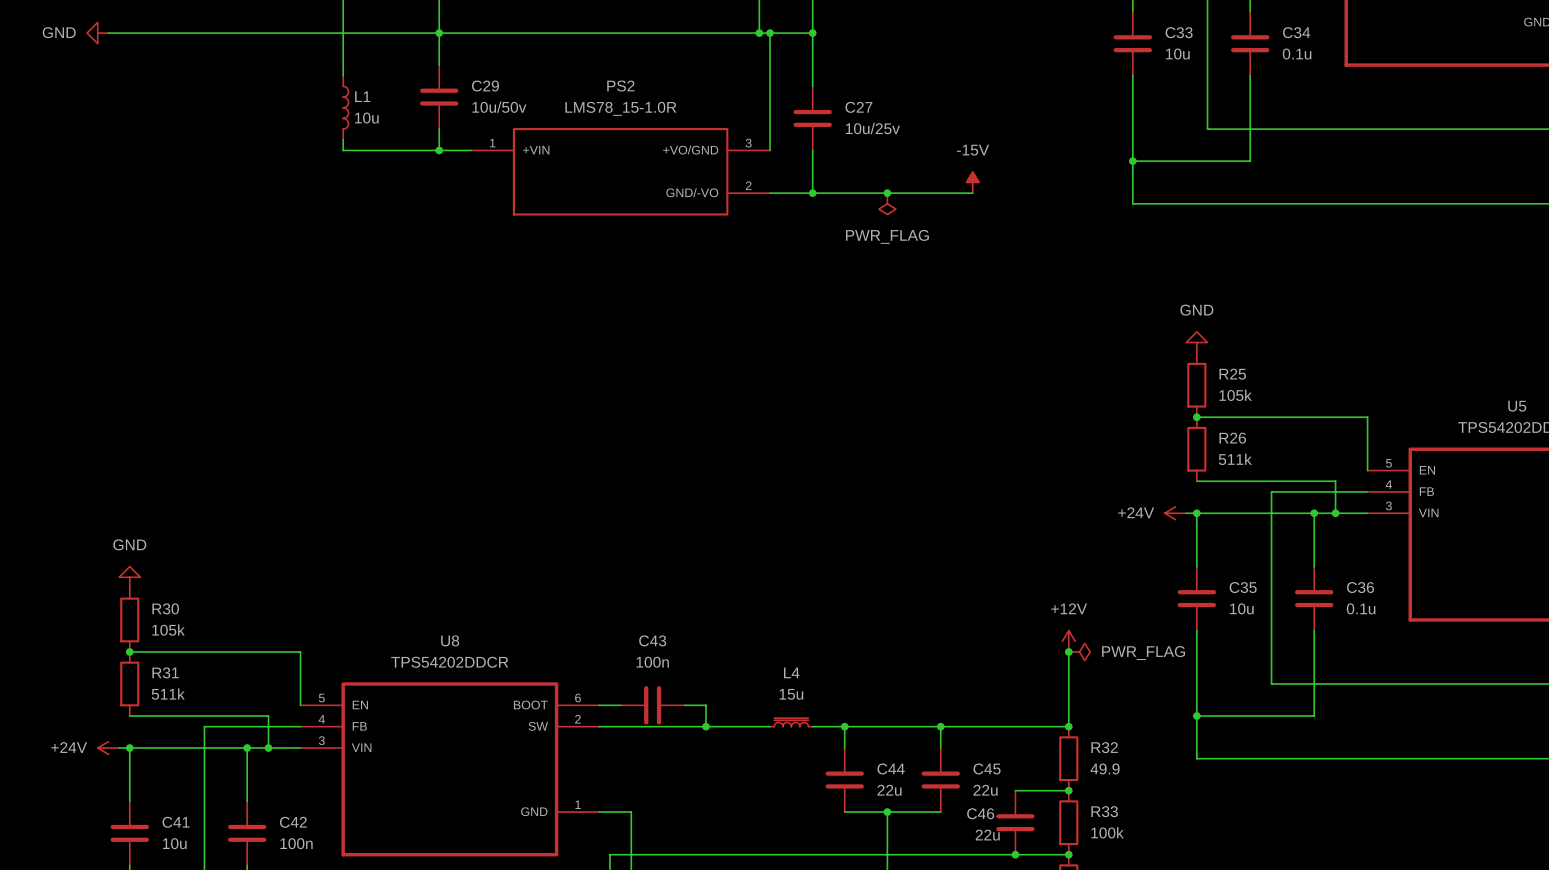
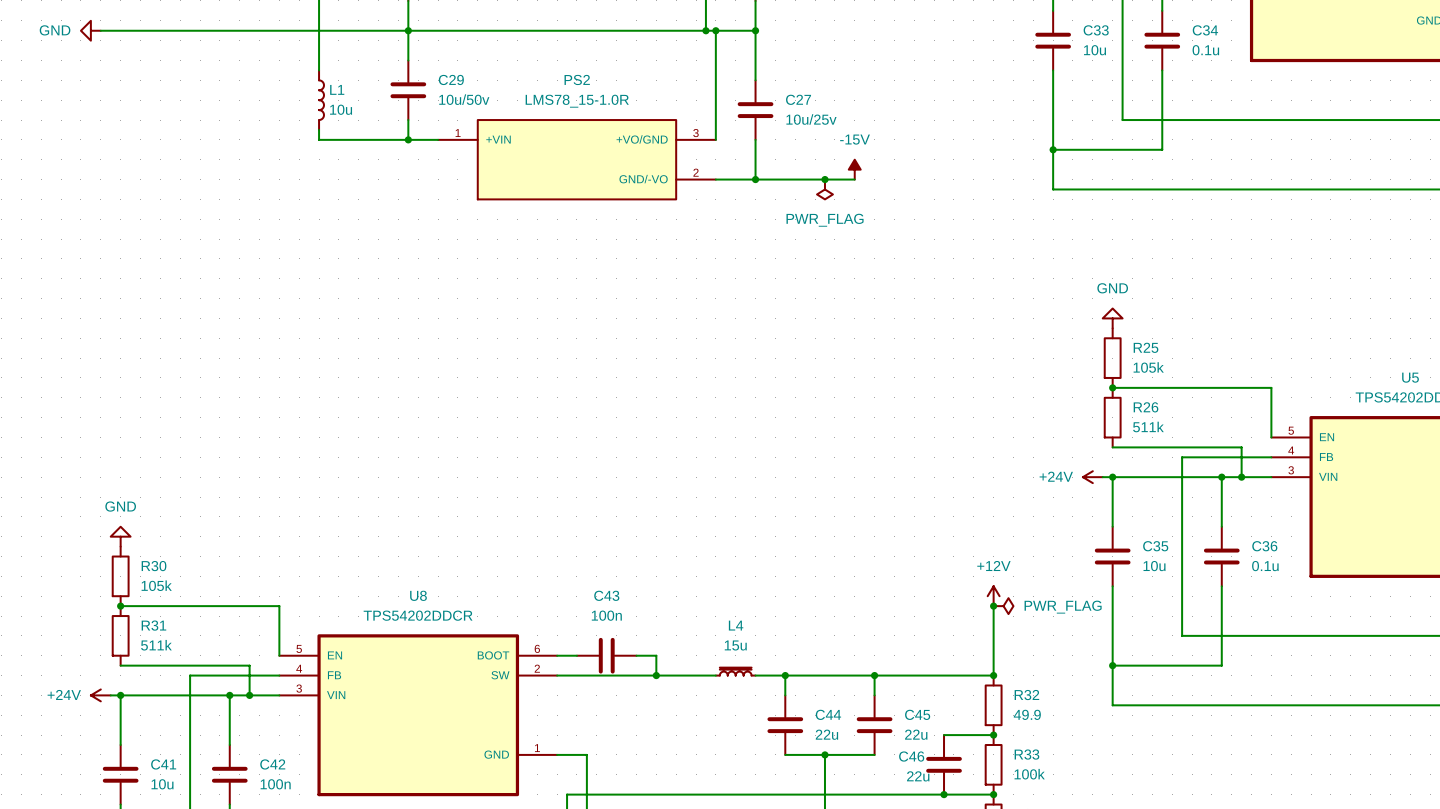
power symbol position: -15V (972, 182) -> -15V (854, 169)
wire: (919, 193) (972, 193) -> none

